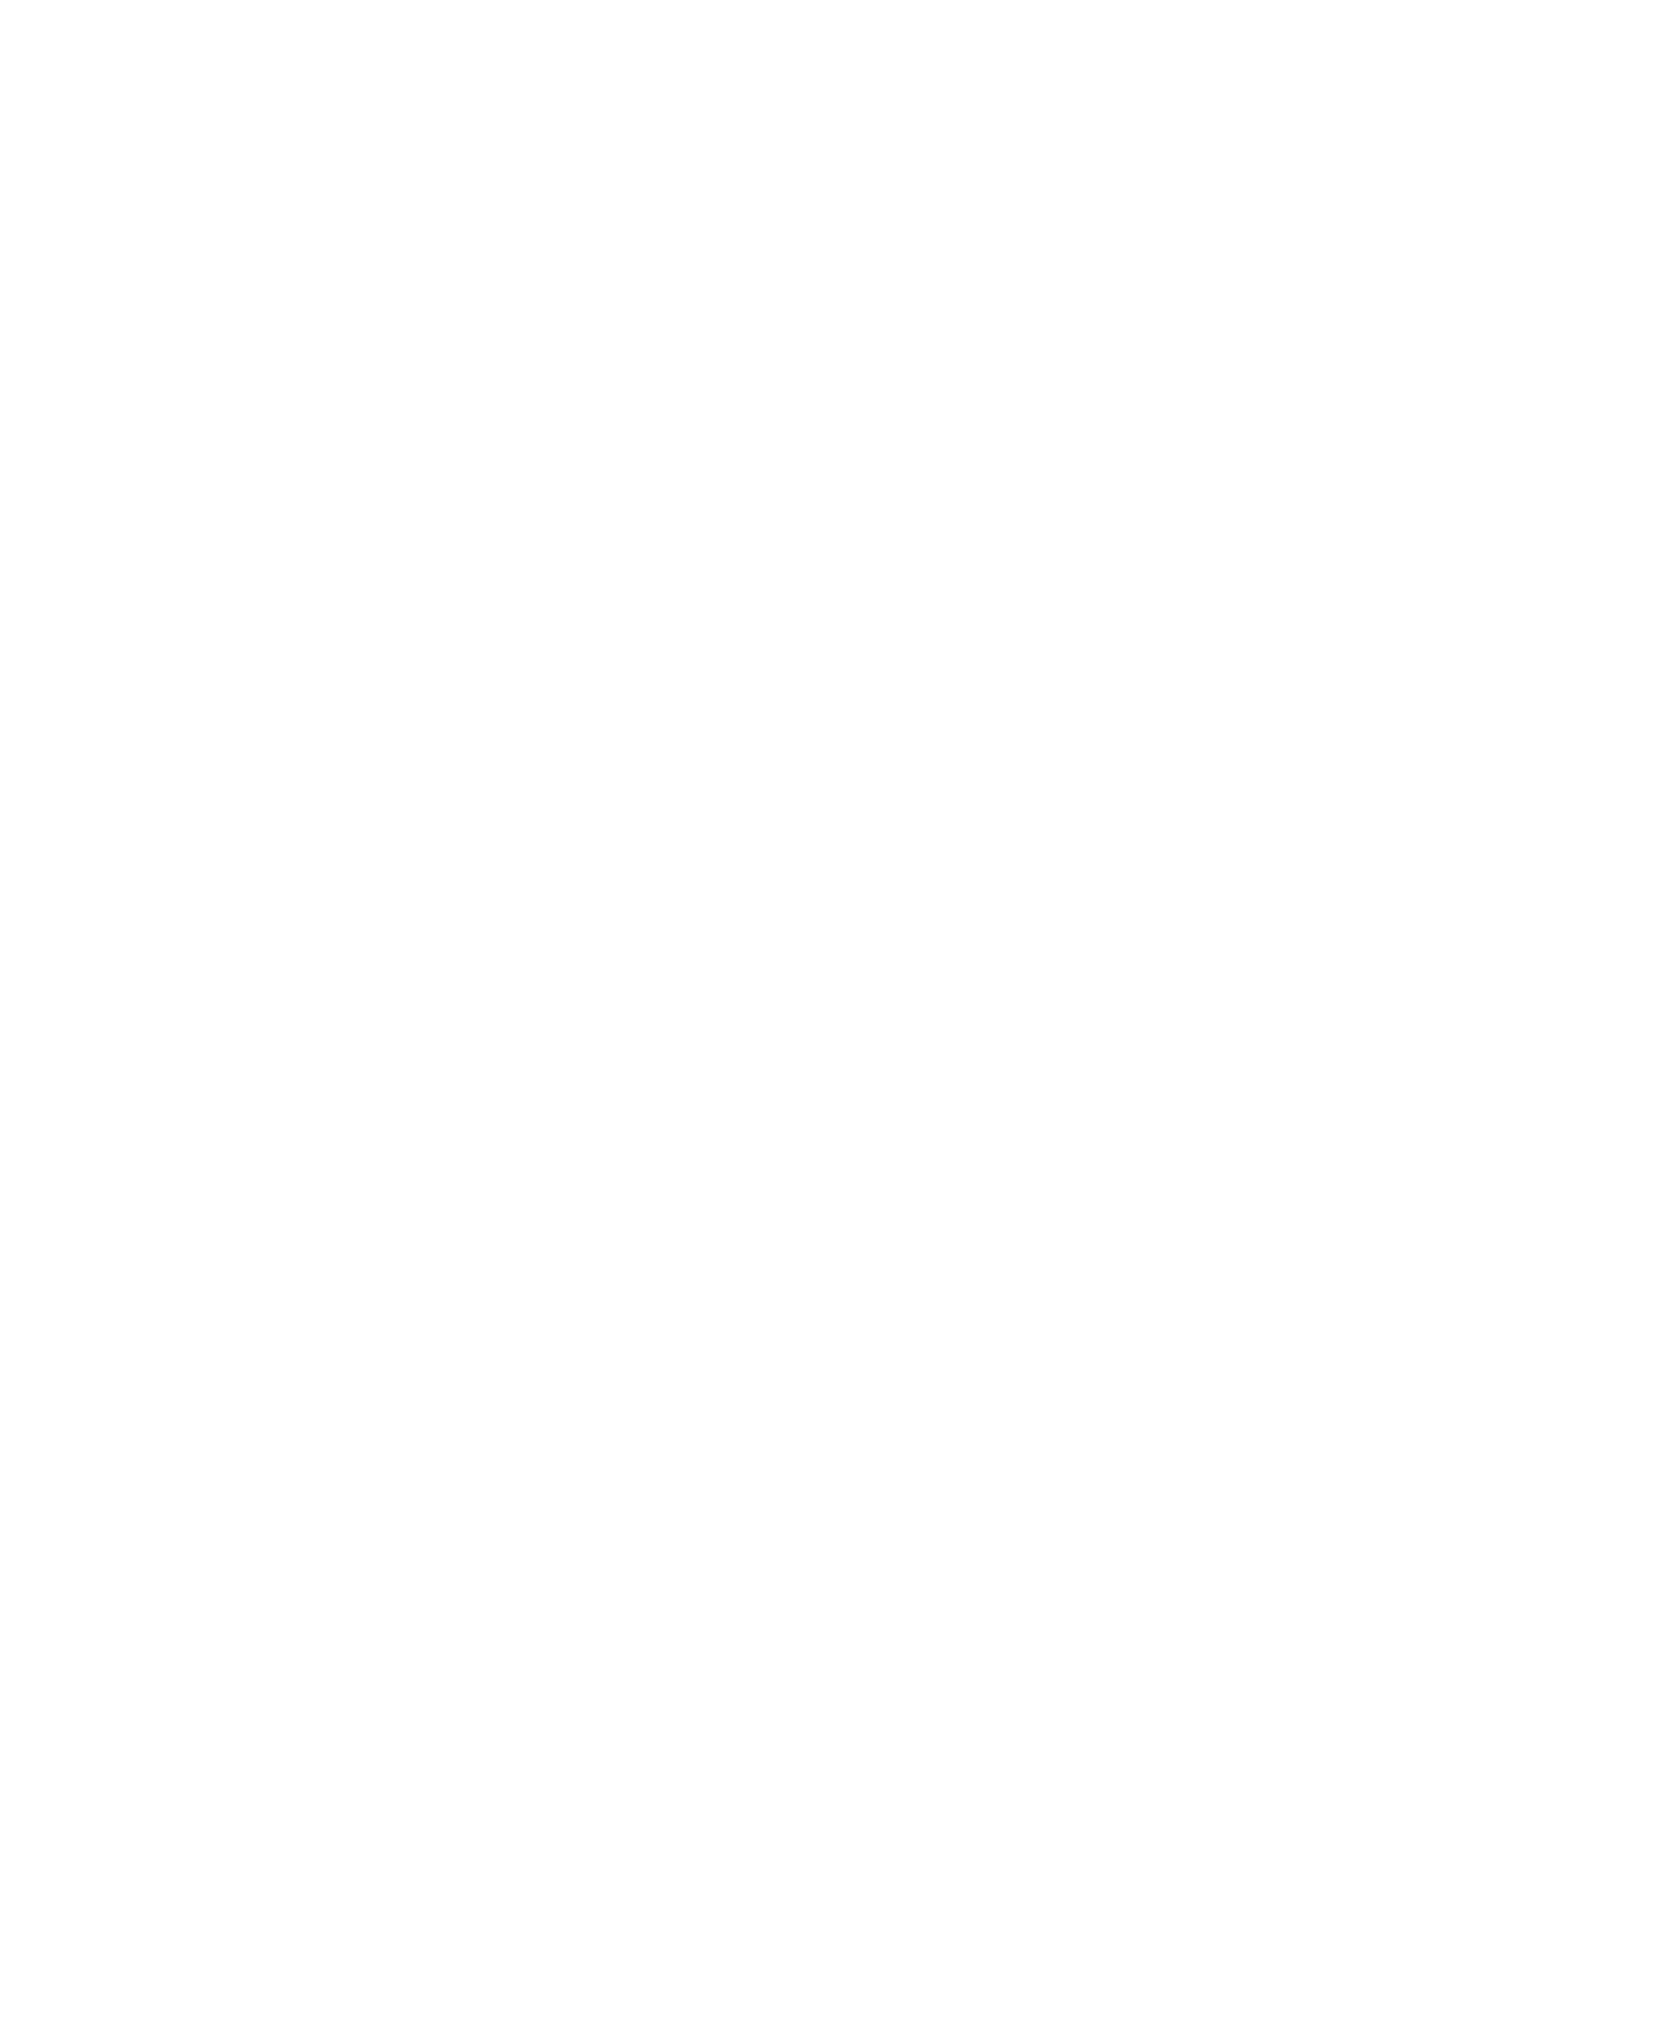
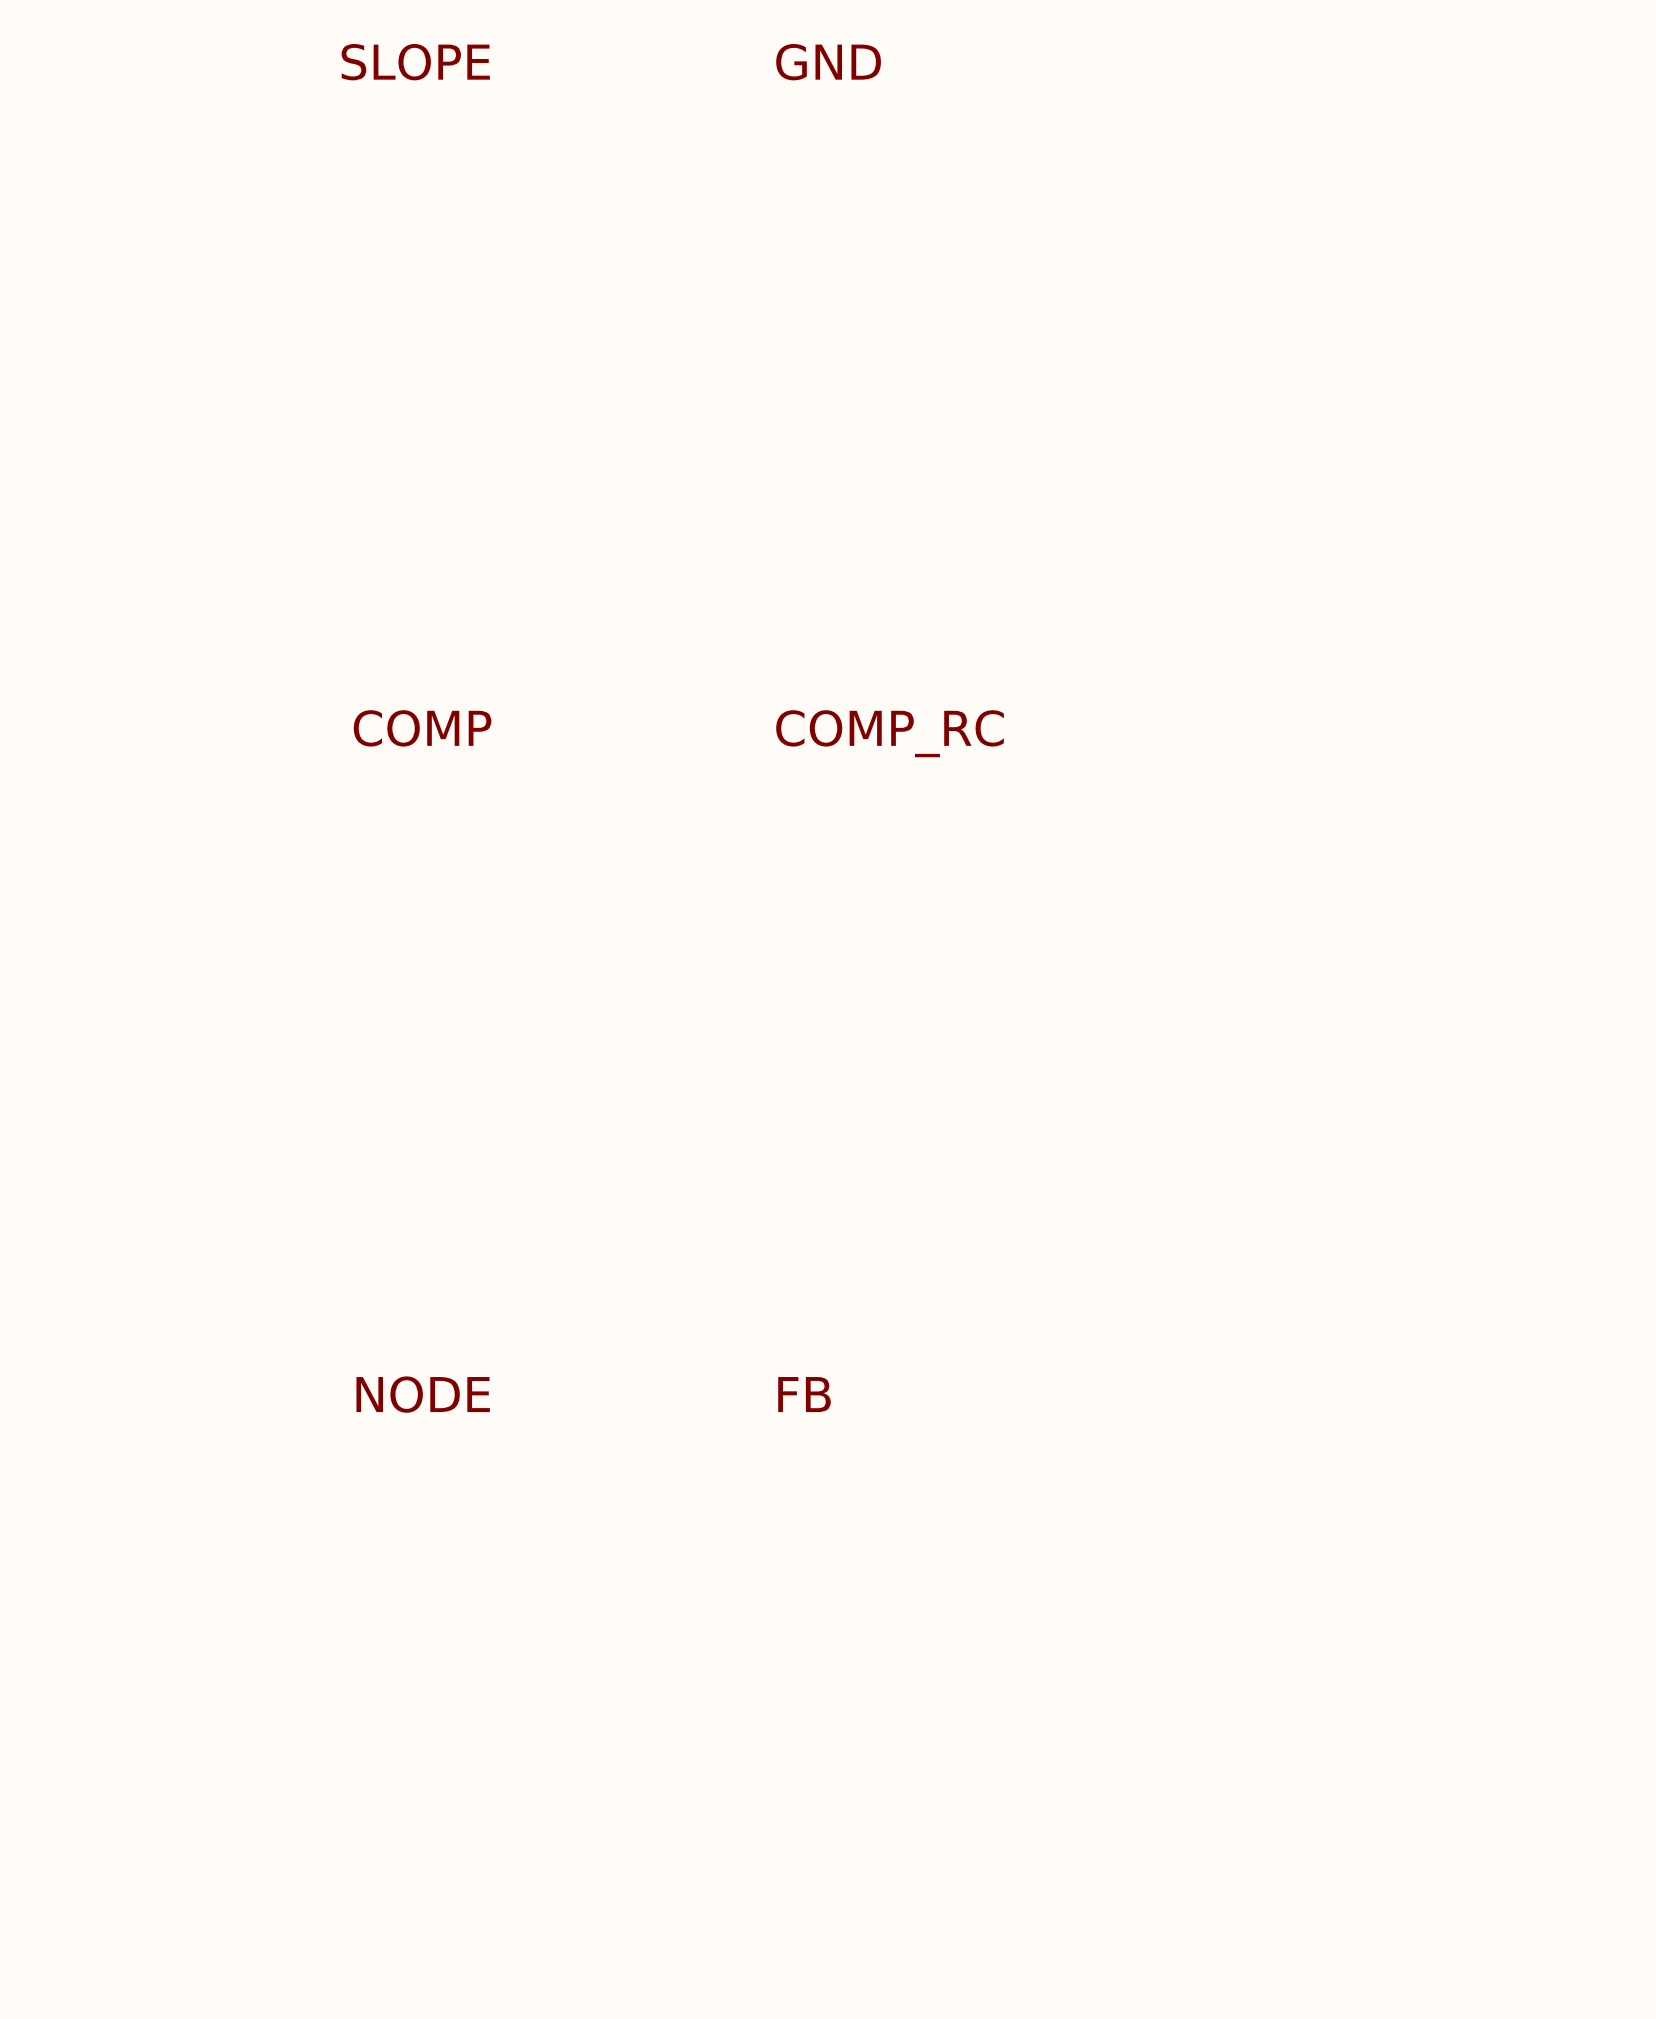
label: none -> SLOPE (415, 62)
label: none -> GND (828, 62)
label: none -> COMP (422, 728)
label: none -> COMP_RC (890, 733)
label: none -> NODE (423, 1394)
label: none -> FB (804, 1394)

